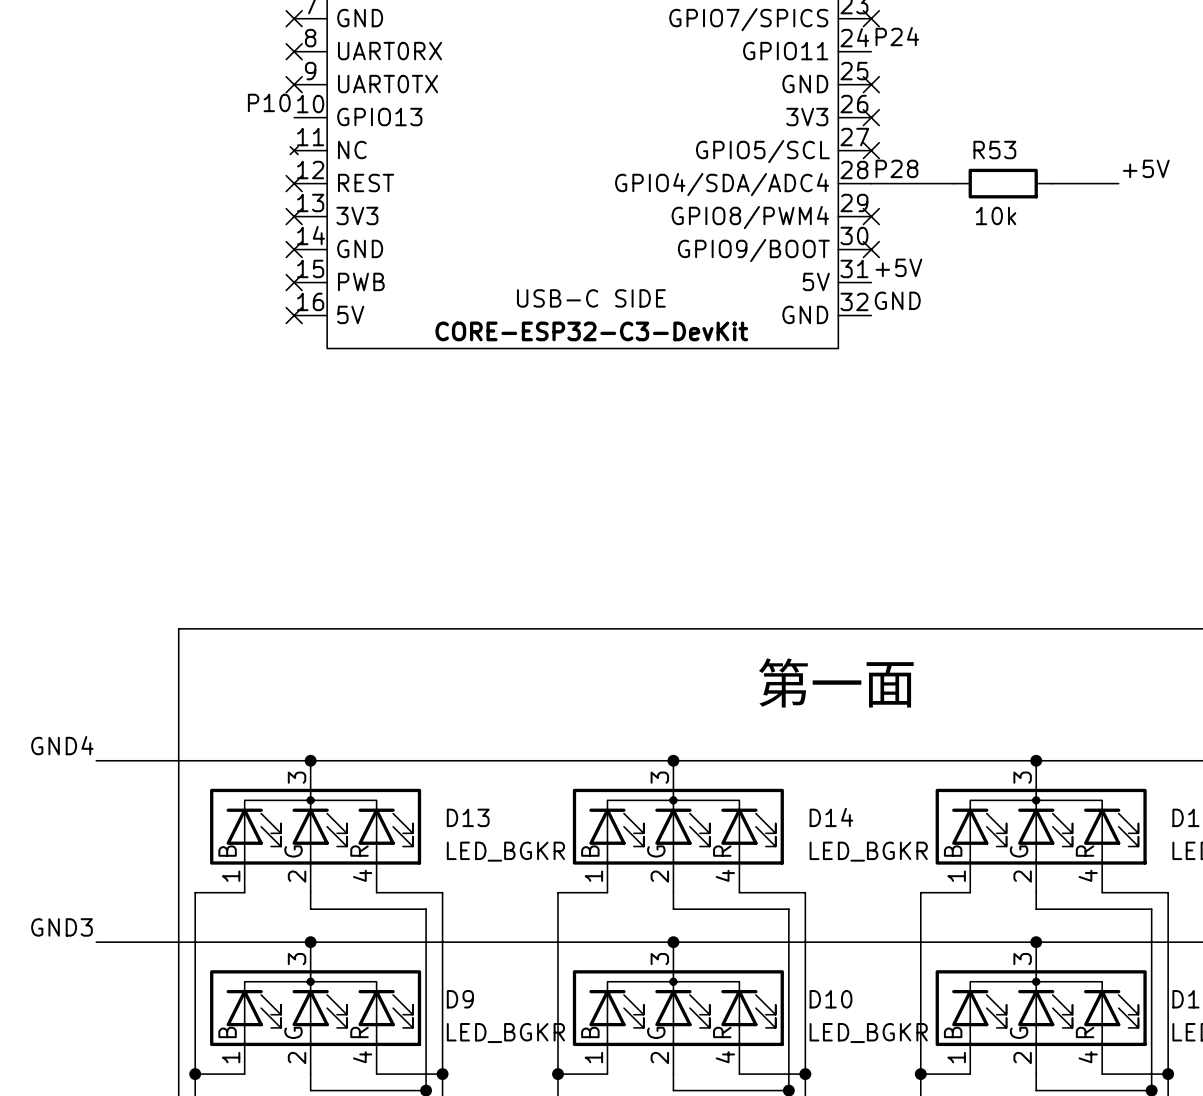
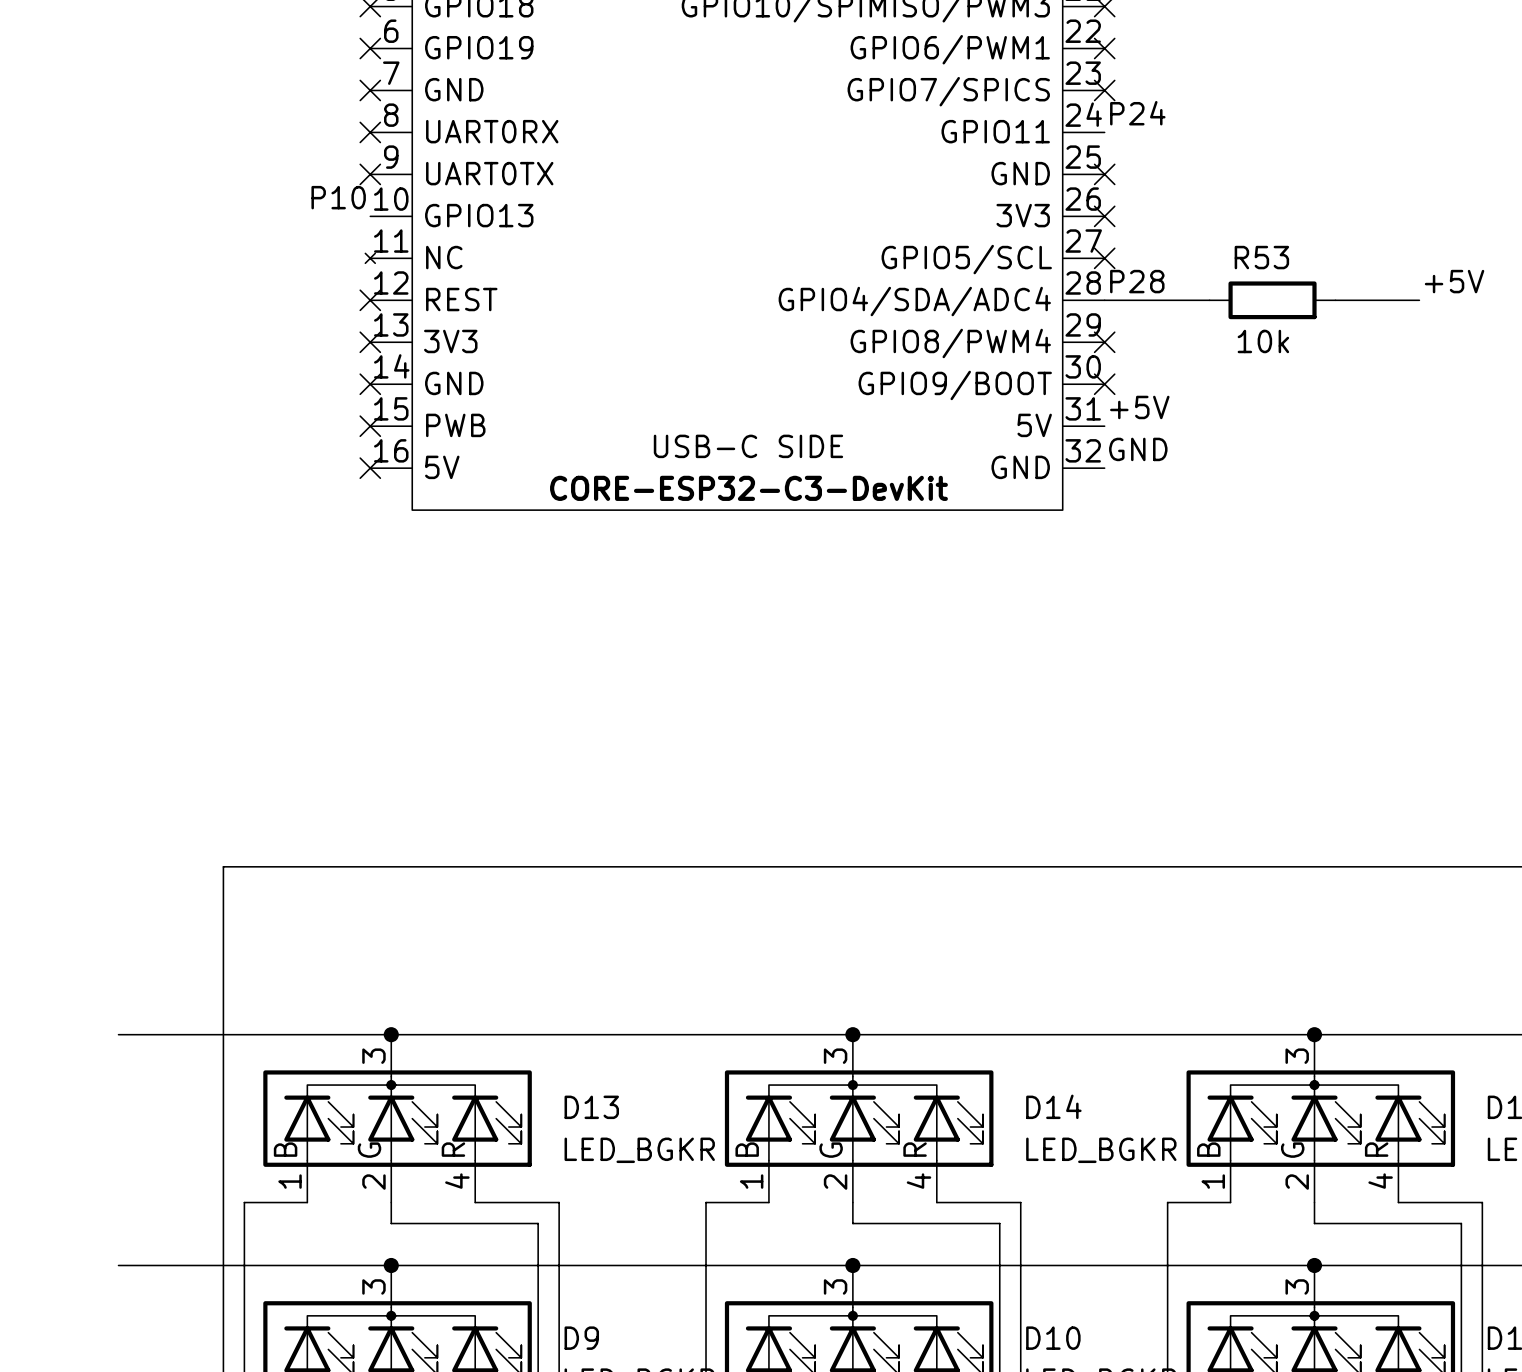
text: 第一面 (836, 682) -> none
label: GND4 (62, 745) -> none
label: GND3 (61, 927) -> none

